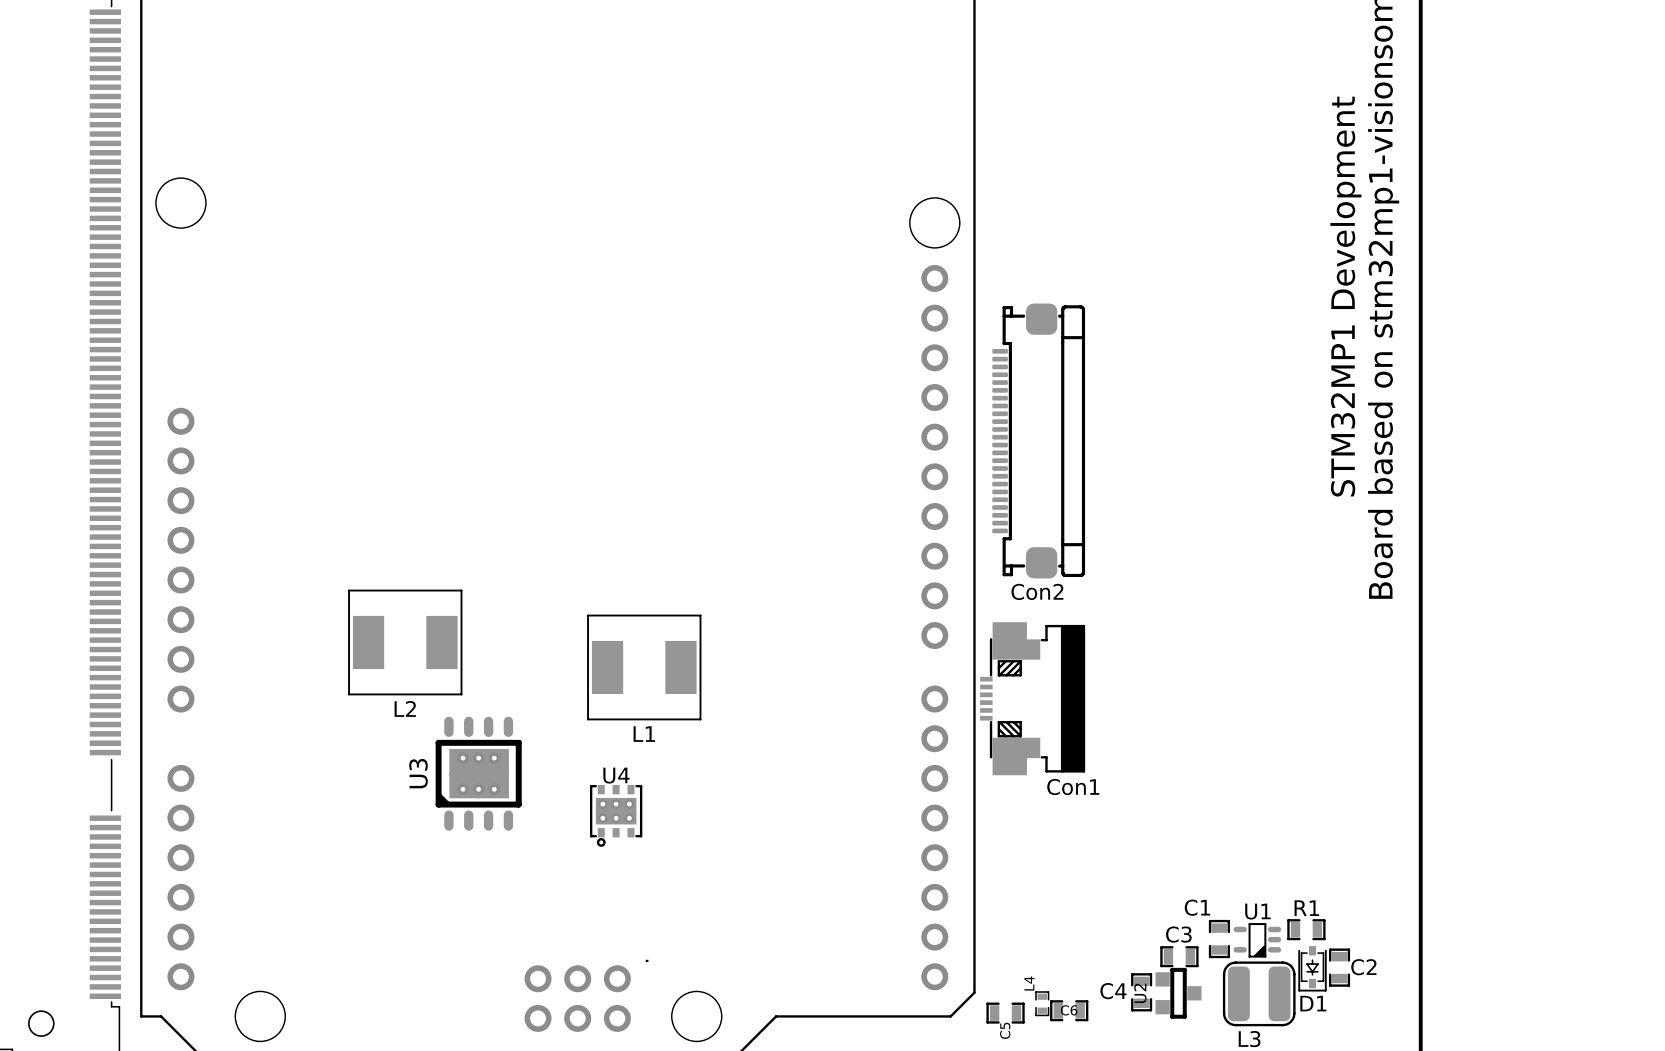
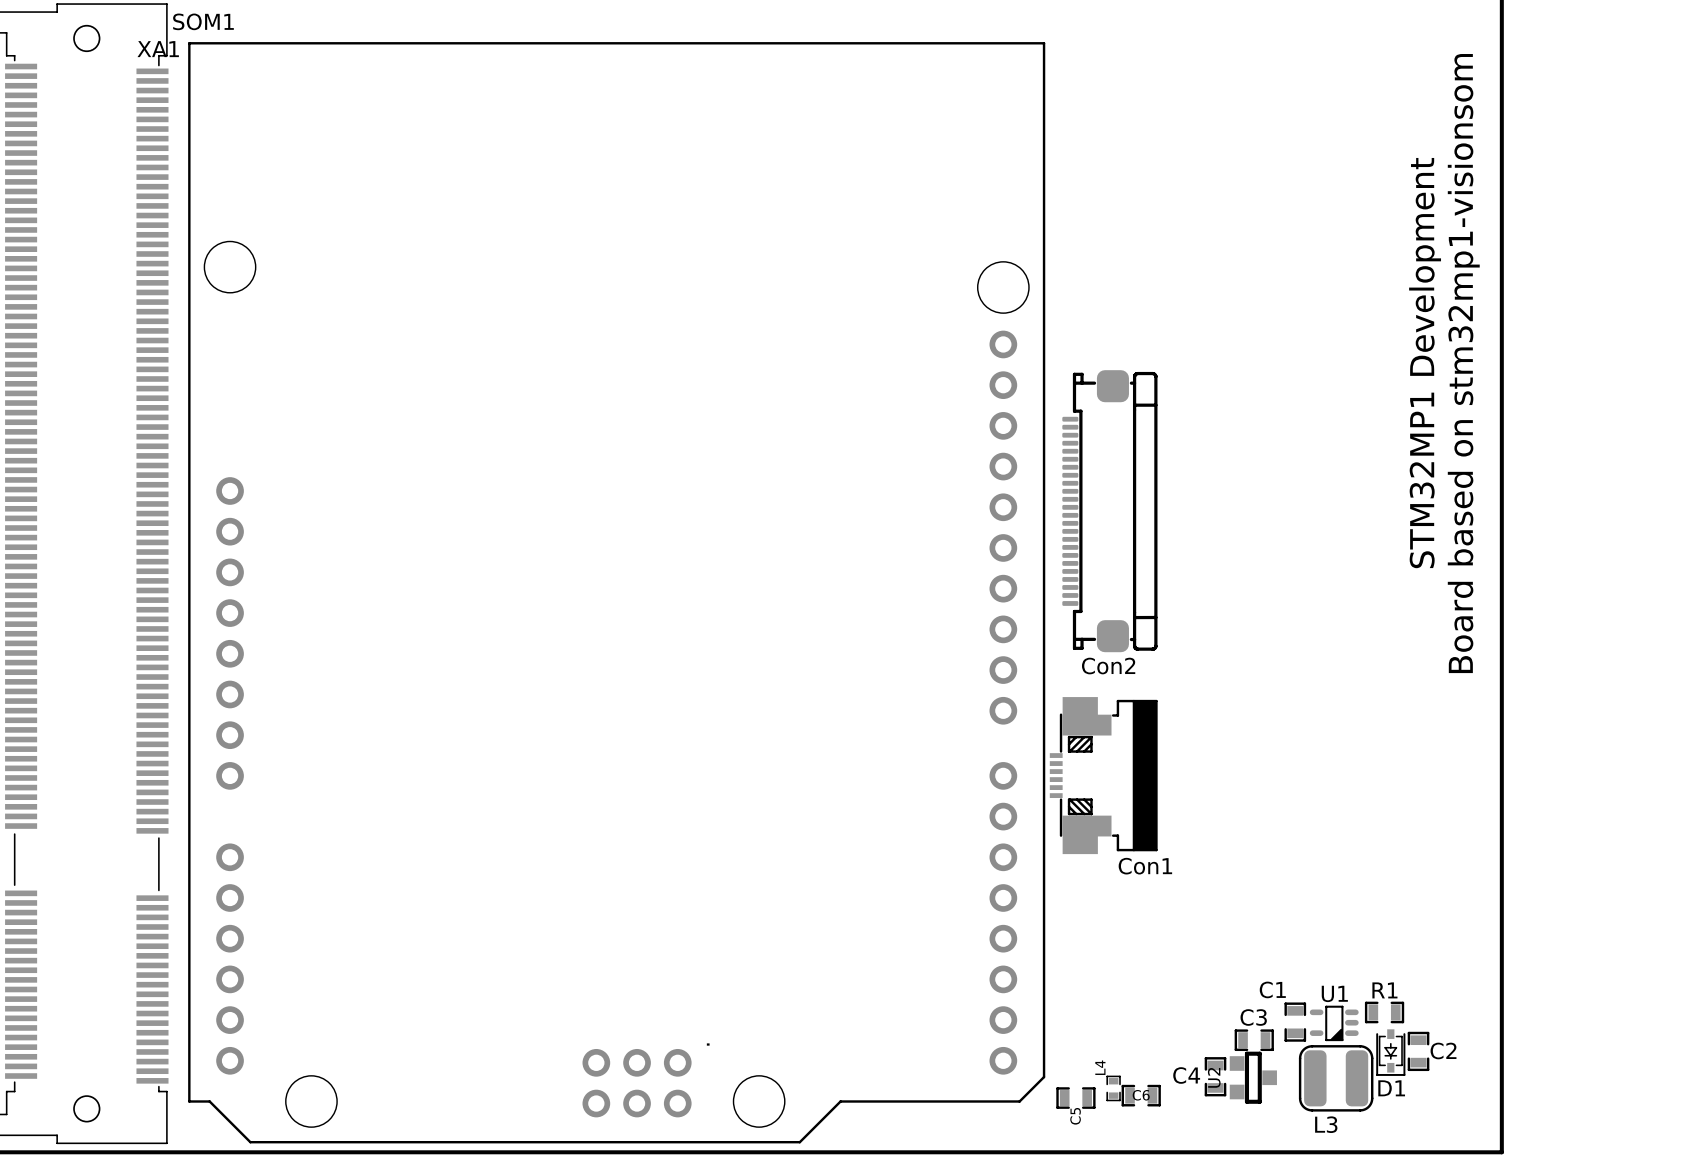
L2: (405, 642) -> none
L1: (644, 667) -> none
U3: (478, 773) -> none
U4: (616, 815) -> none

